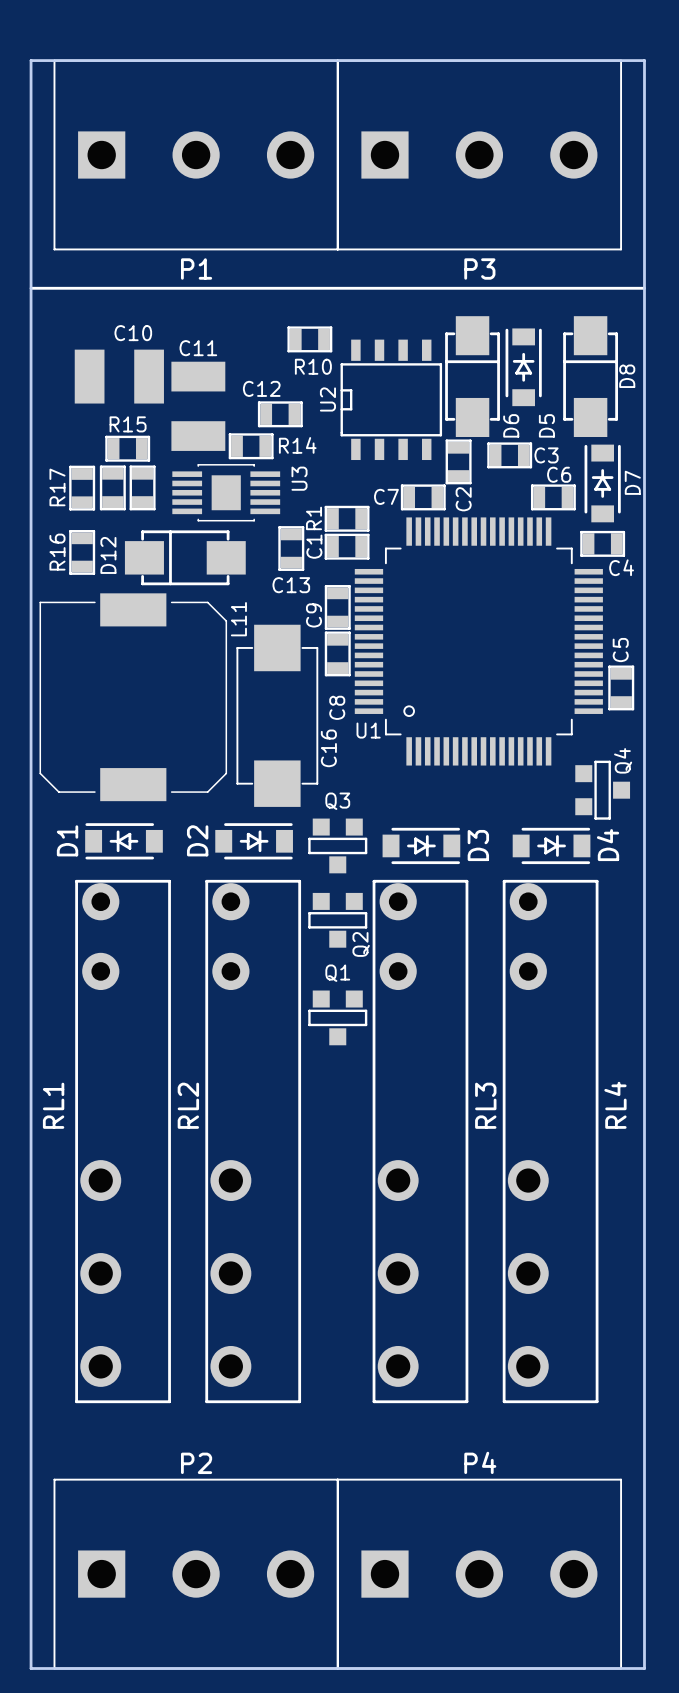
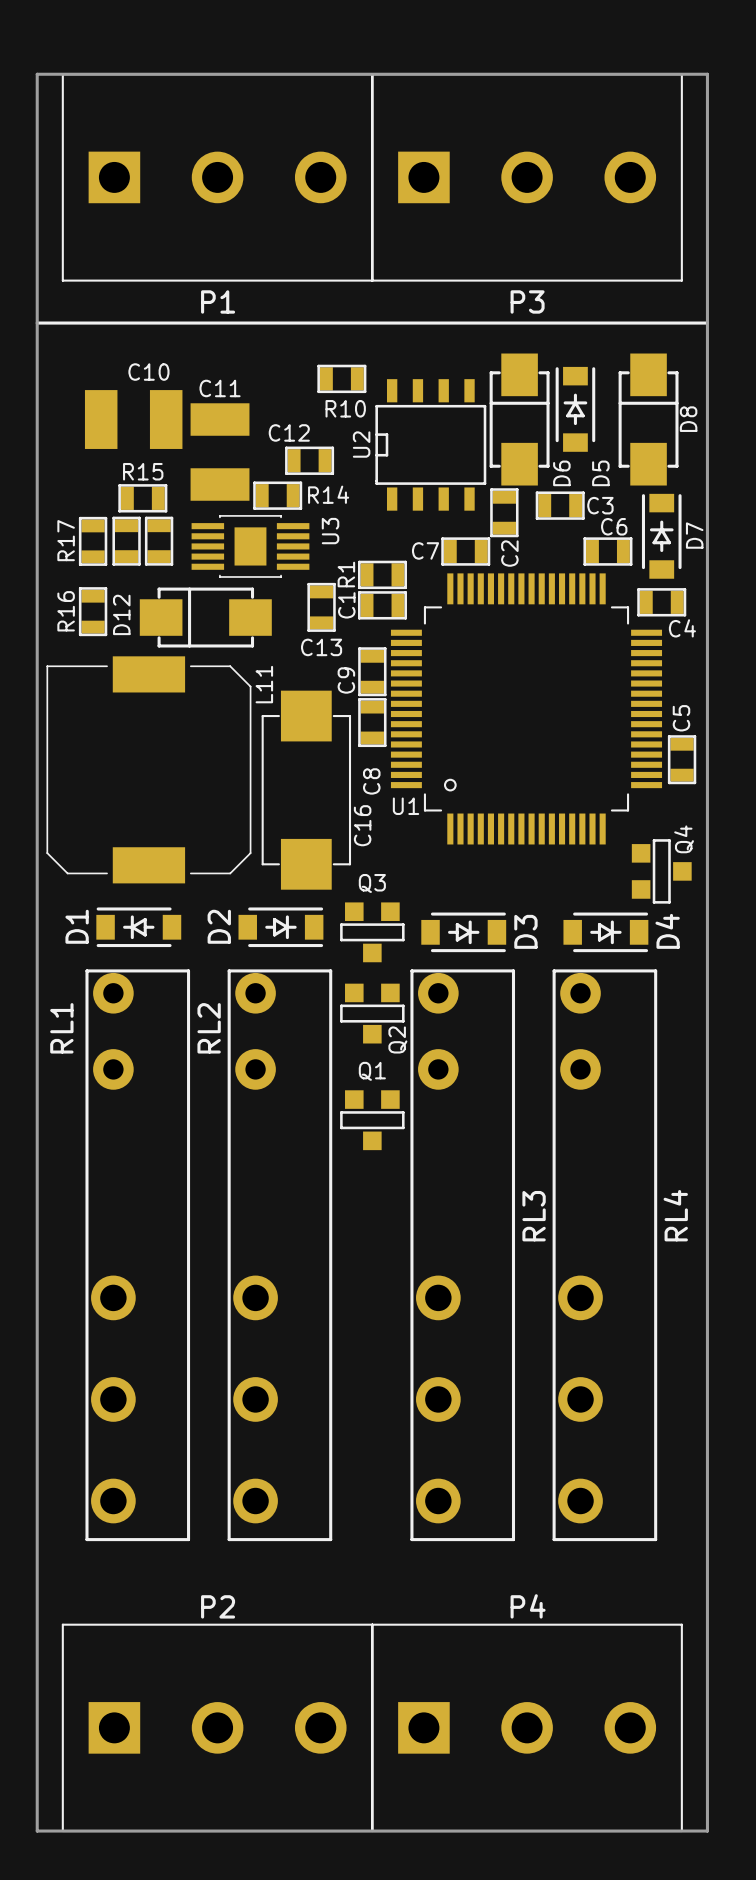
RL1 name position: RL1 (53, 1105) -> RL1 (61, 1028)
RL2 name position: RL2 (188, 1105) -> RL2 (209, 1028)

